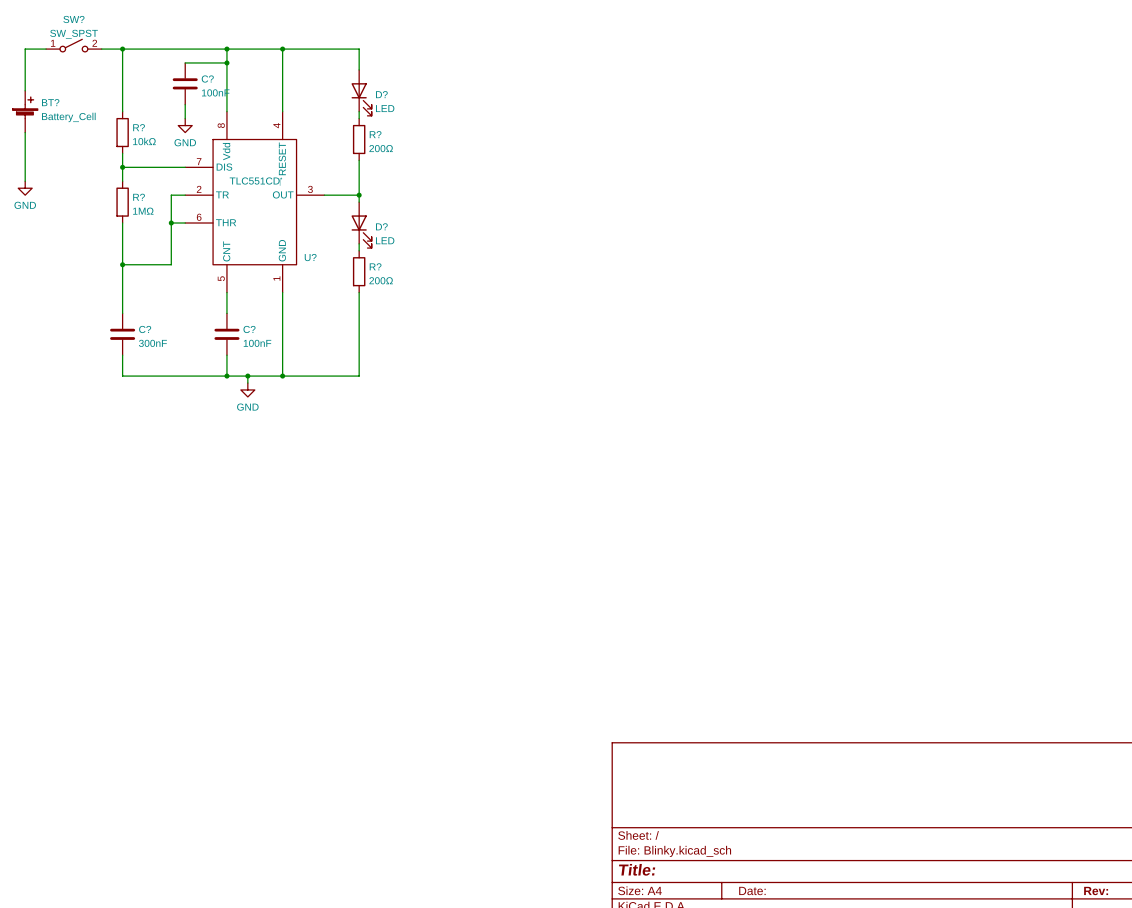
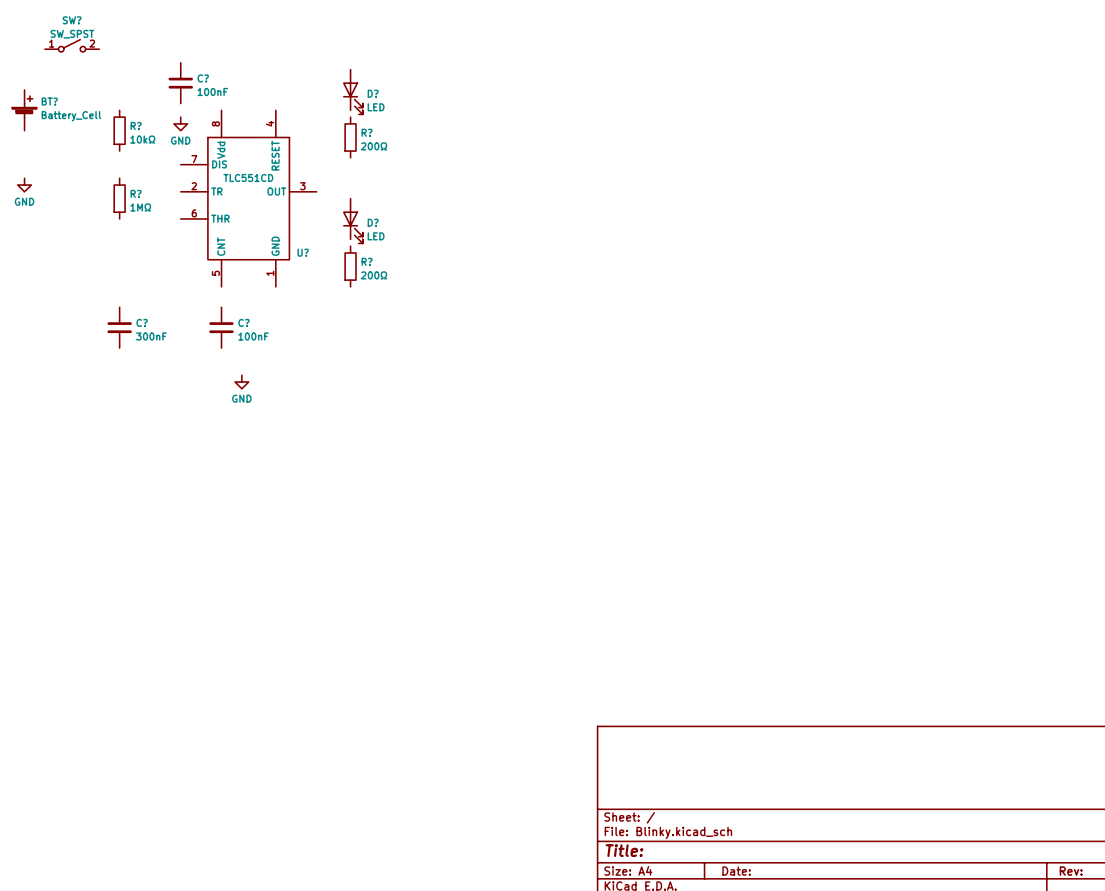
wire: (46, 49) (25, 49) (25, 90) -> none
wire: (101, 49) (359, 49) (359, 69) -> none
wire: (122, 49) (122, 111) -> none
junction: (122, 49) -> none
wire: (226, 49) (226, 111) -> none
junction: (226, 49) -> none
wire: (282, 49) (282, 111) -> none
junction: (282, 49) -> none
wire: (185, 62) (226, 62) -> none
junction: (226, 62) -> none
wire: (185, 104) (185, 118) -> none
wire: (359, 111) (359, 118) -> none
wire: (25, 132) (25, 181) -> none
wire: (122, 153) (122, 181) -> none
wire: (359, 160) (359, 202) -> none
wire: (122, 167) (185, 167) -> none
junction: (122, 167) -> none
wire: (185, 195) (171, 195) (171, 264) (122, 264) -> none
wire: (324, 195) (359, 195) -> none
junction: (359, 195) -> none
wire: (122, 223) (122, 313) -> none
wire: (171, 223) (185, 223) -> none
junction: (171, 223) -> none
wire: (359, 243) (359, 250) -> none
junction: (122, 264) -> none
wire: (226, 292) (226, 313) -> none
wire: (282, 292) (282, 376) -> none
wire: (359, 292) (359, 376) (122, 376) (122, 355) -> none
wire: (226, 355) (226, 376) -> none
junction: (226, 376) -> none
wire: (247, 376) (247, 383) -> none
junction: (247, 376) -> none
junction: (282, 376) -> none

